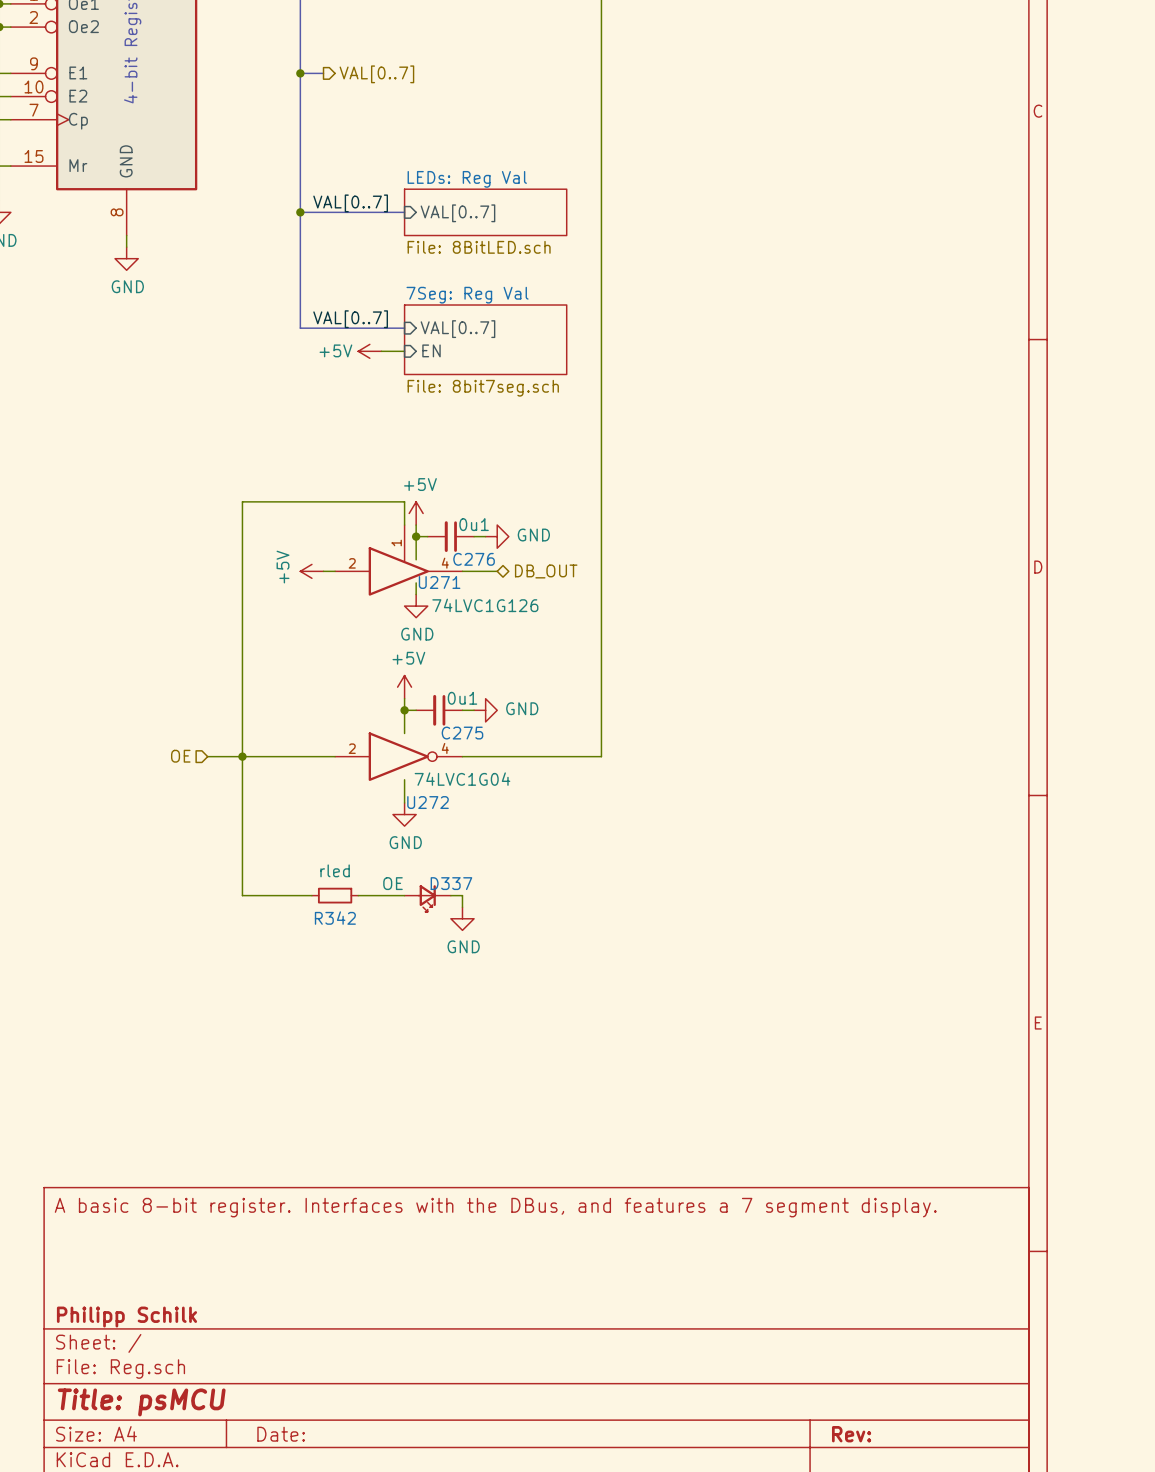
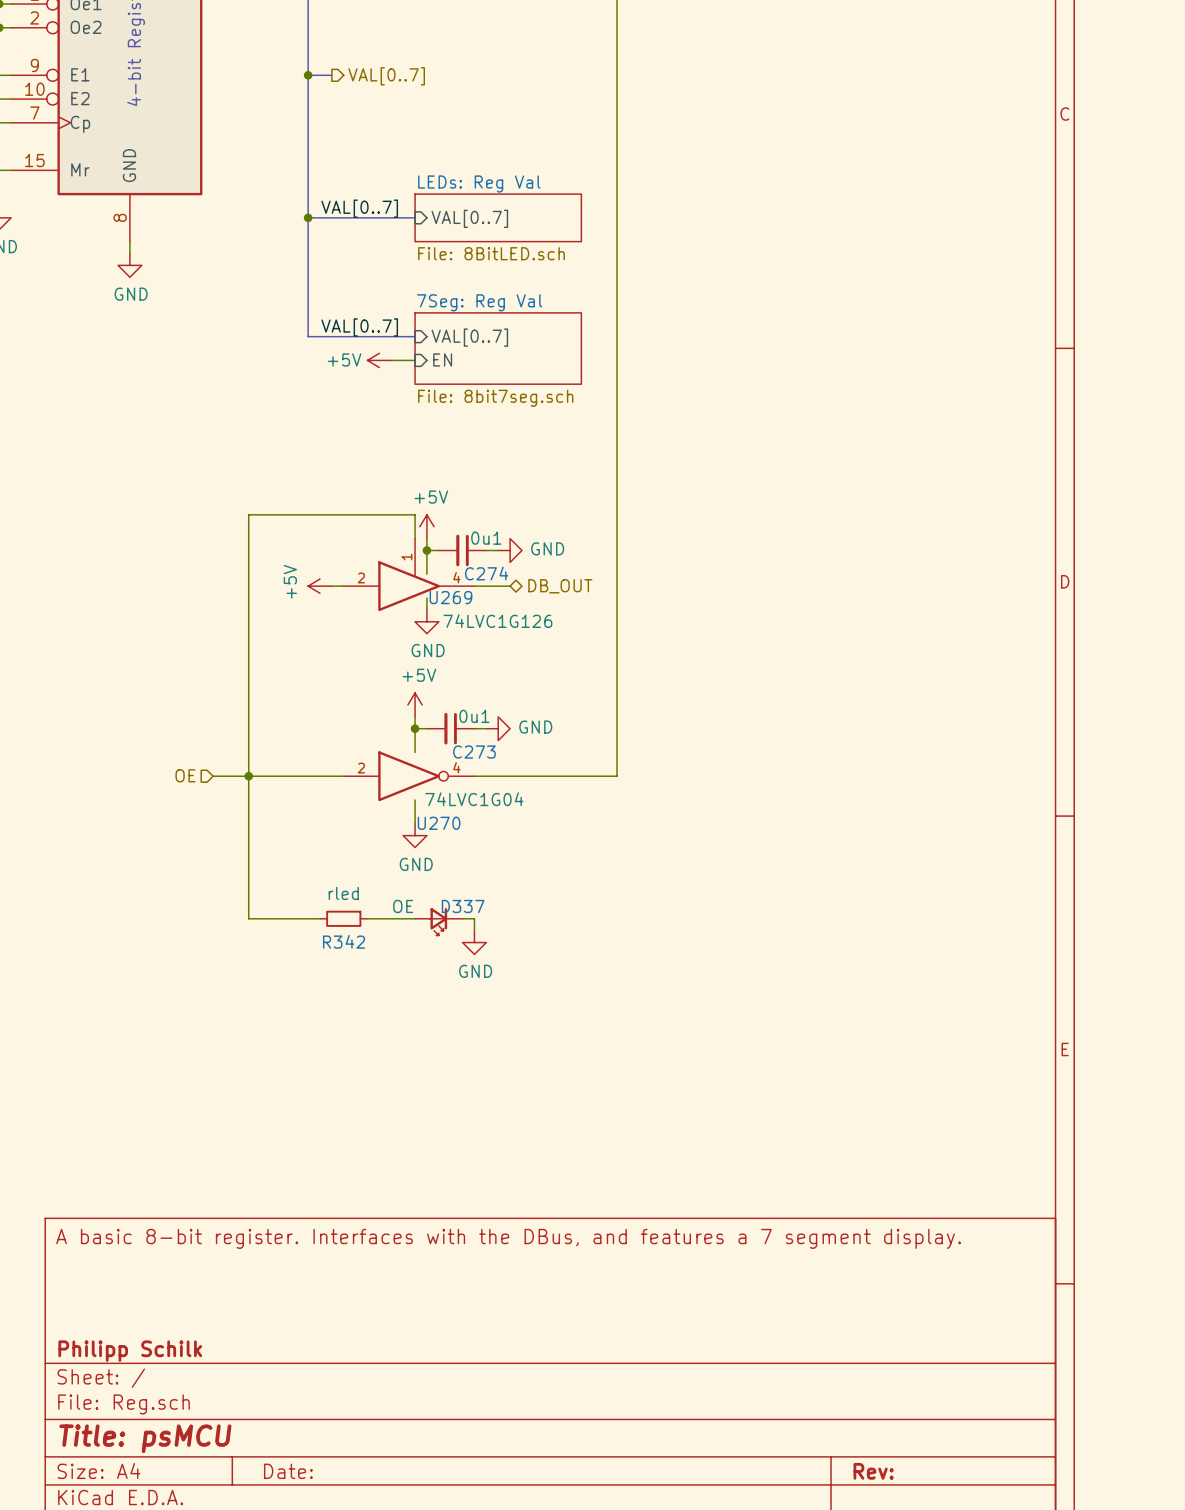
C276 name: C276 (474, 559) -> C274 (486, 573)
U271 name: U271 (439, 582) -> U269 (450, 597)
C275 name: C275 (462, 733) -> C273 (474, 752)
U272 name: U272 (428, 802) -> U270 (439, 823)

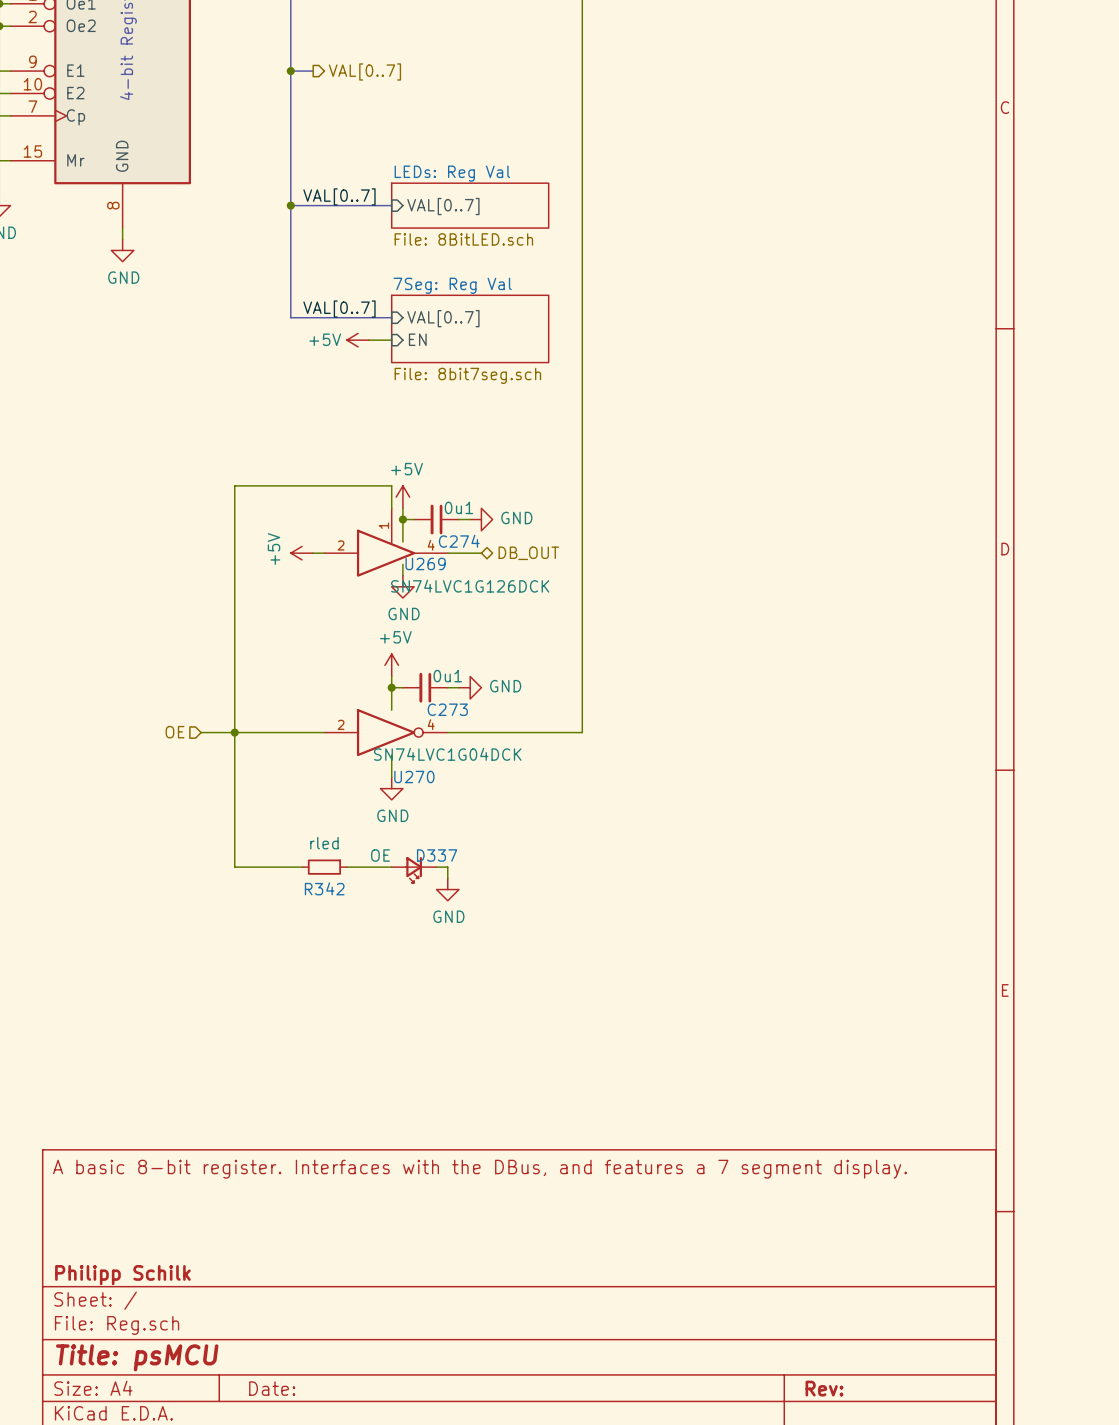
U269 value: 74LVC1G126 (497, 621) -> SN74LVC1G126DCK (470, 586)
U270 value: 74LVC1G04 (474, 799) -> SN74LVC1G04DCK (447, 754)

